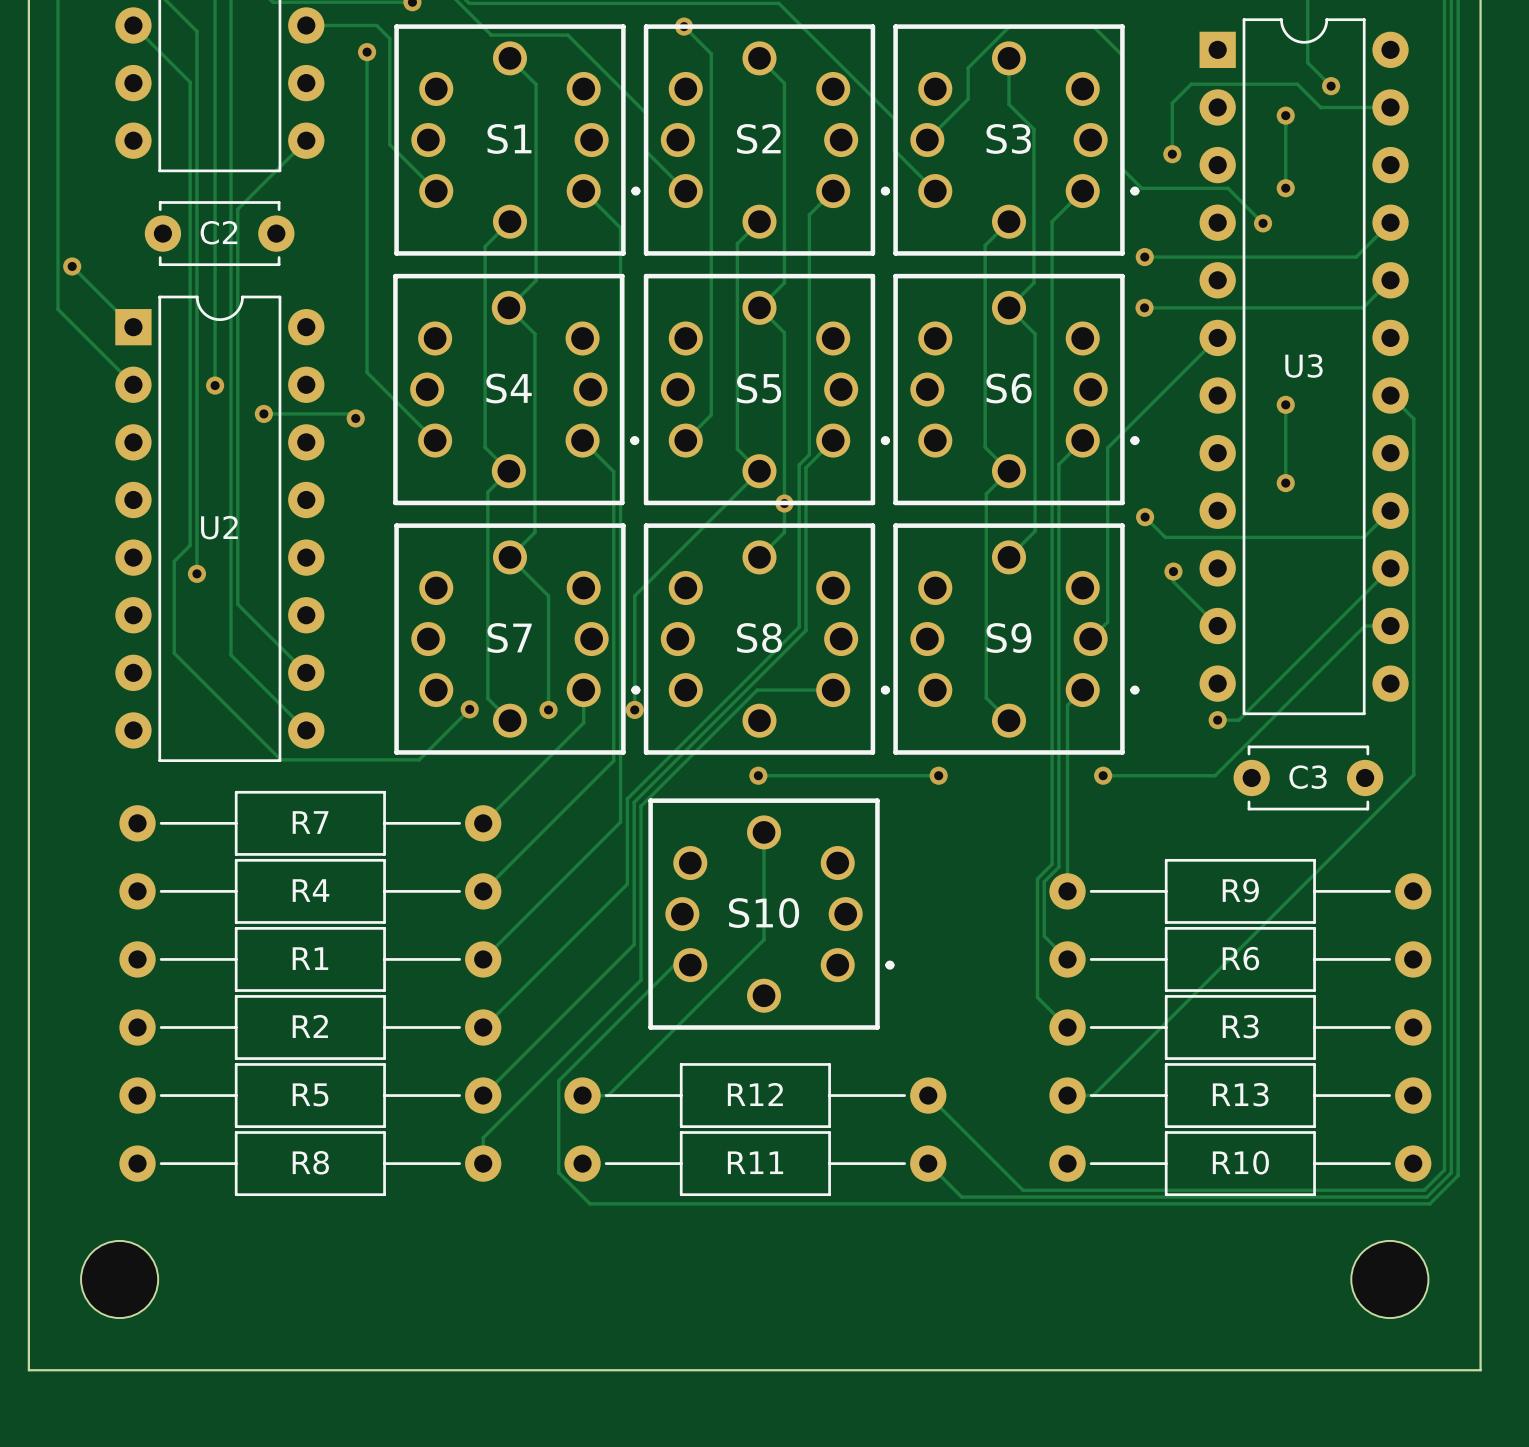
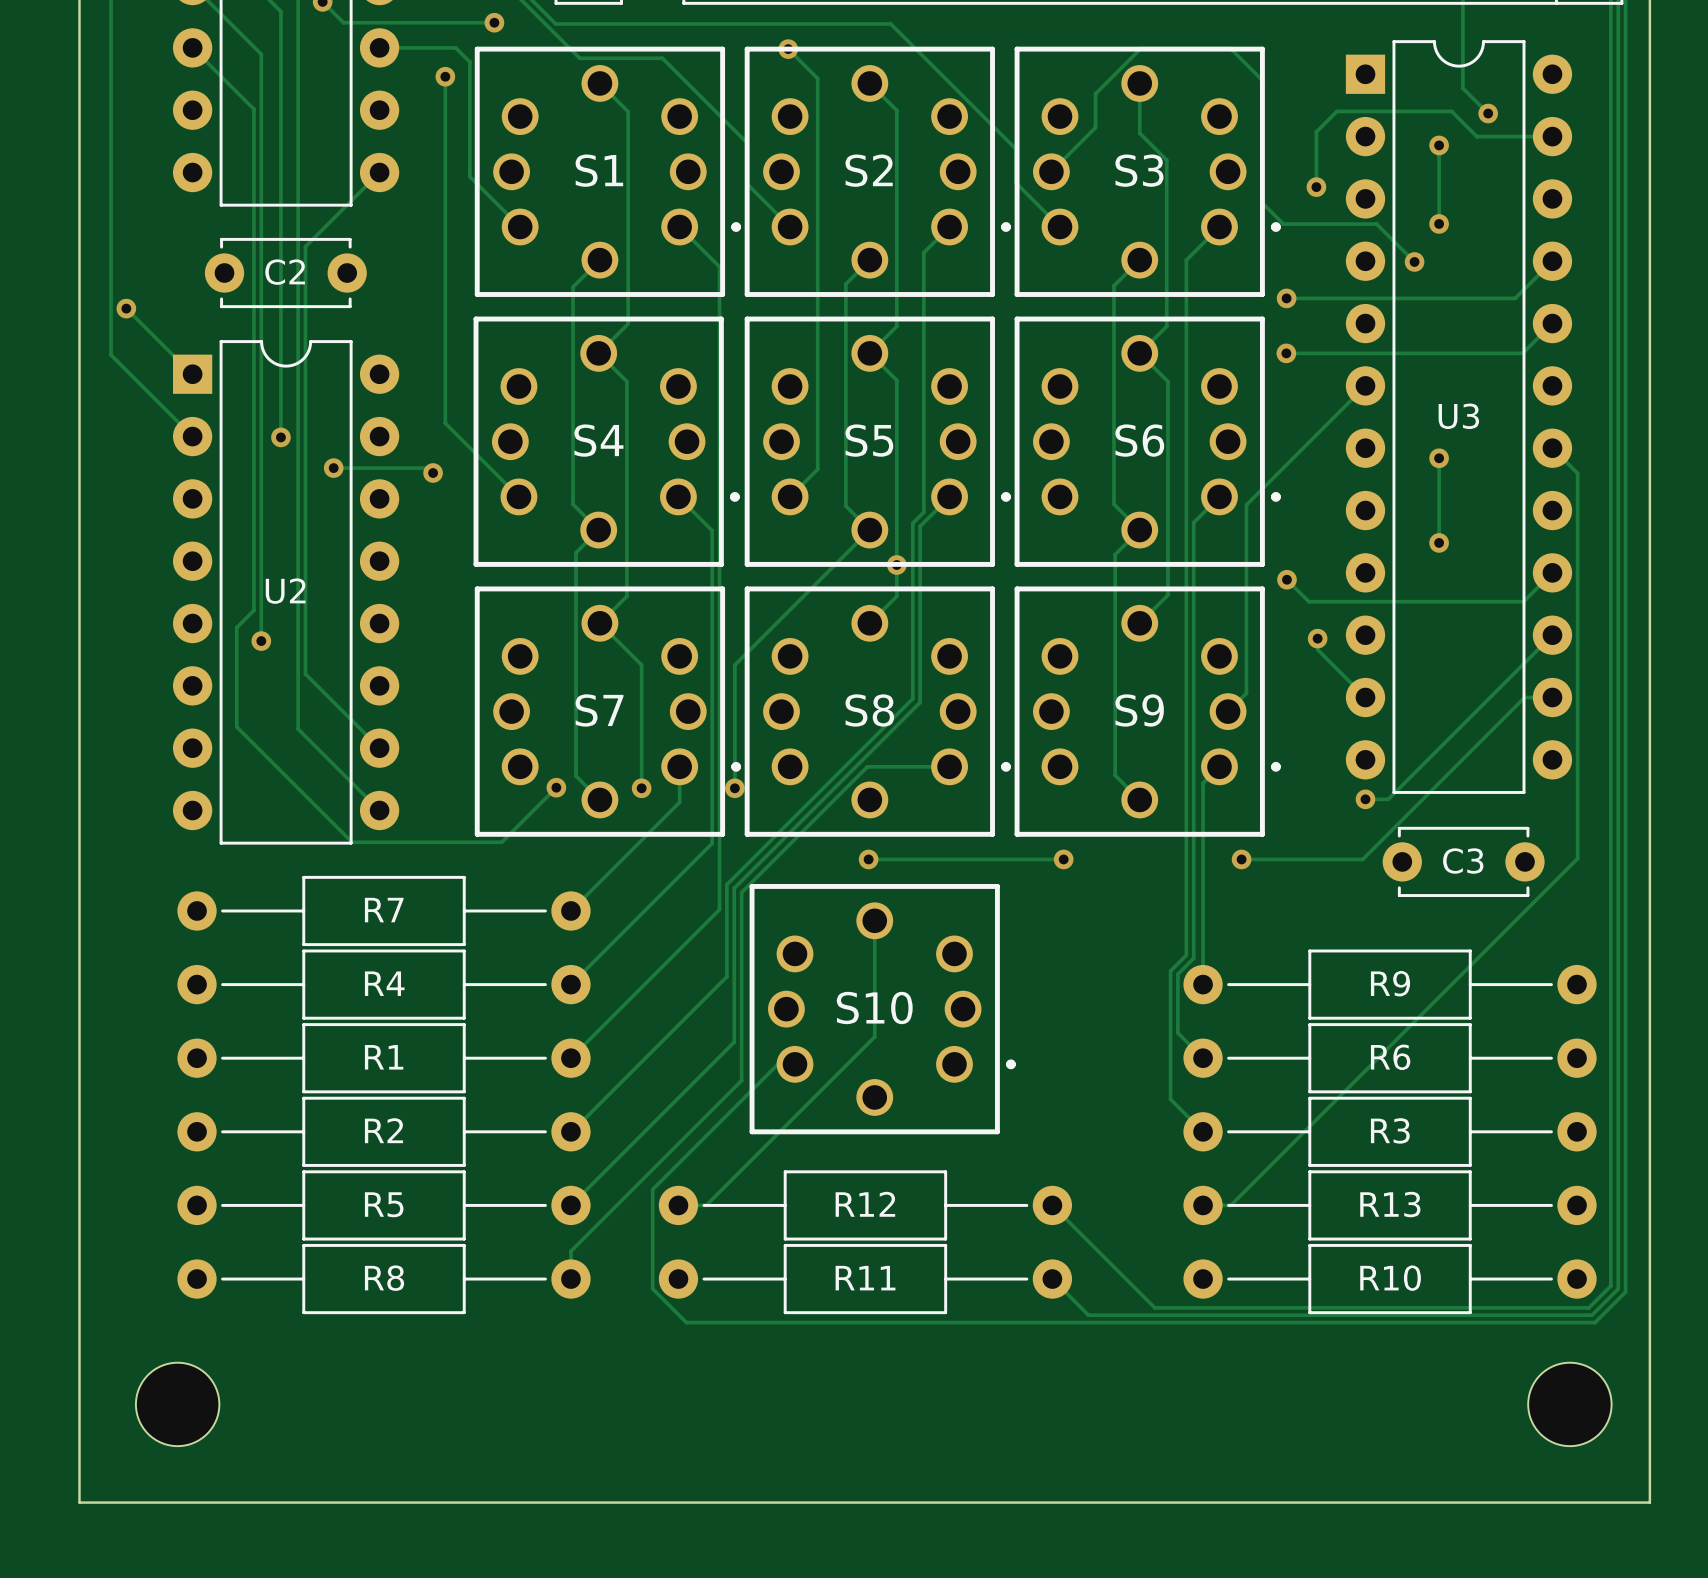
part position: (1389, 1279) -> (1569, 1404)

